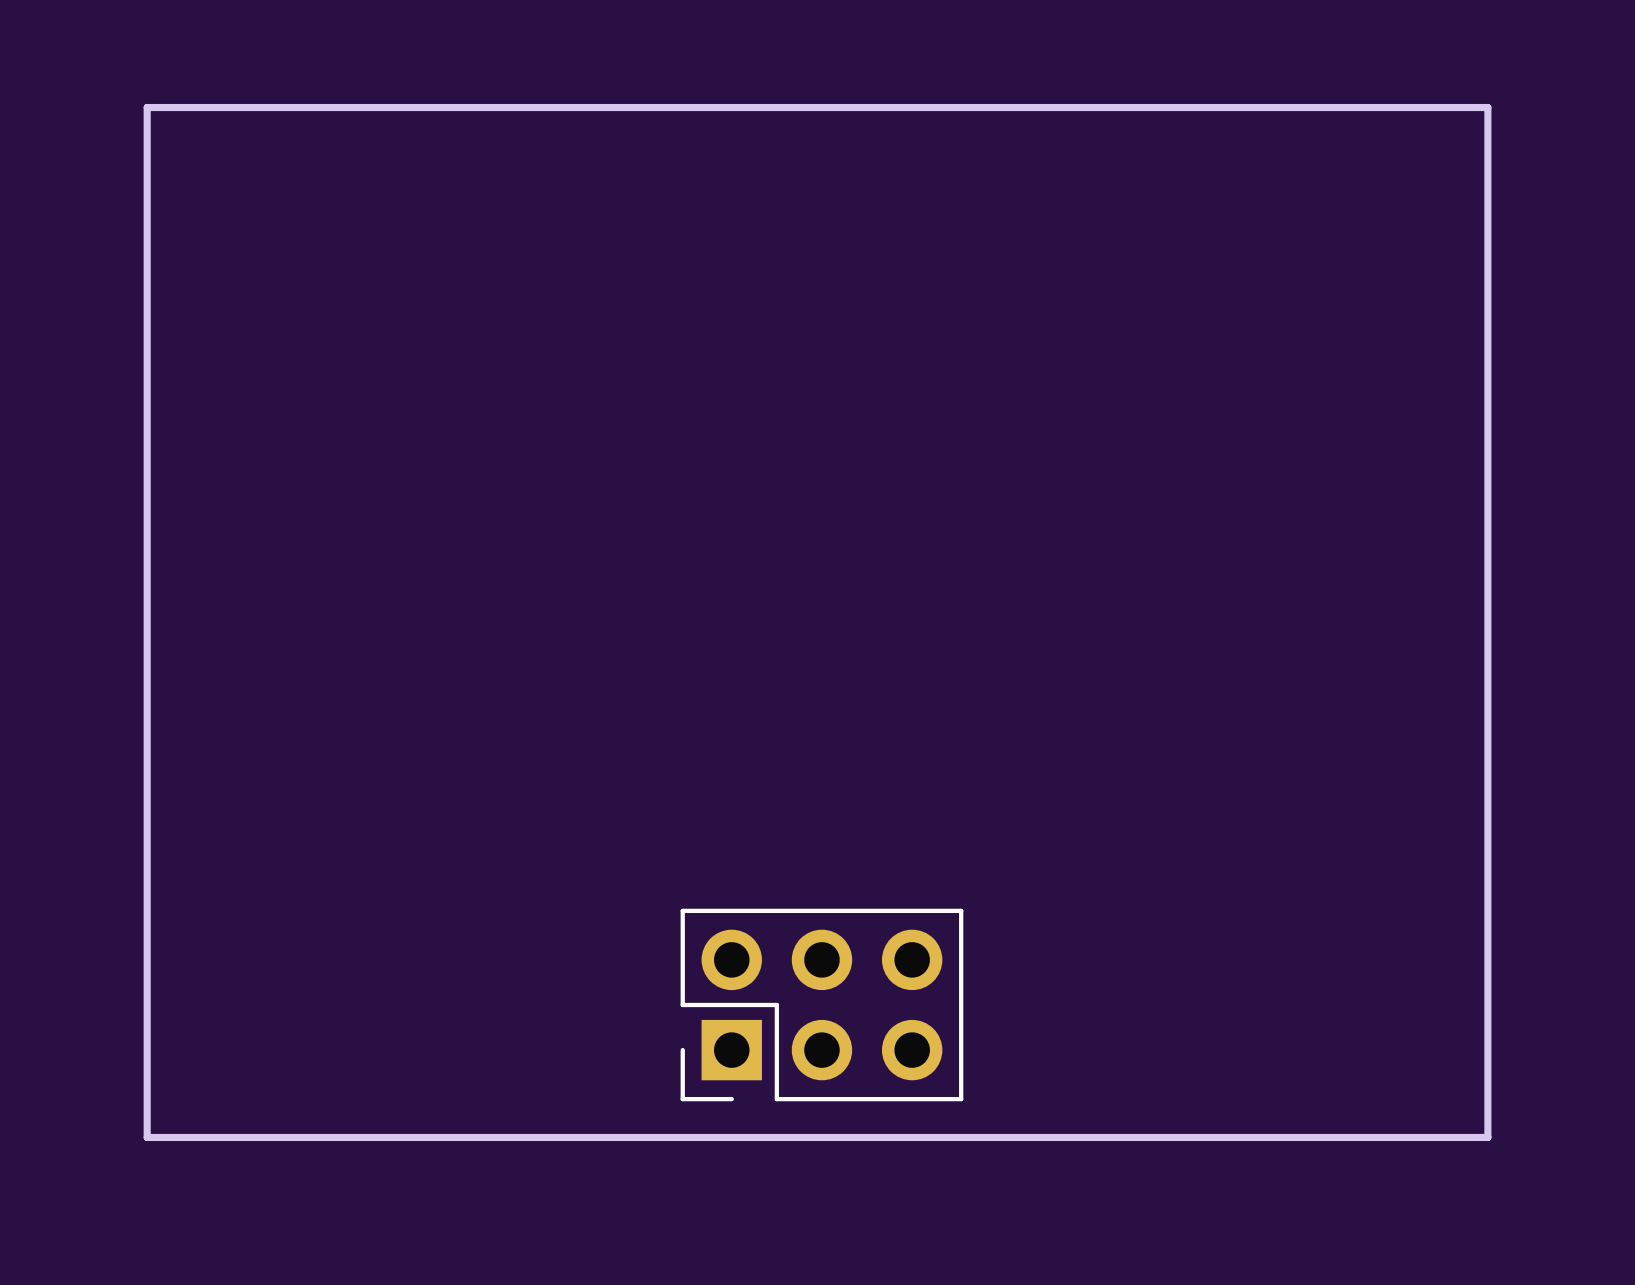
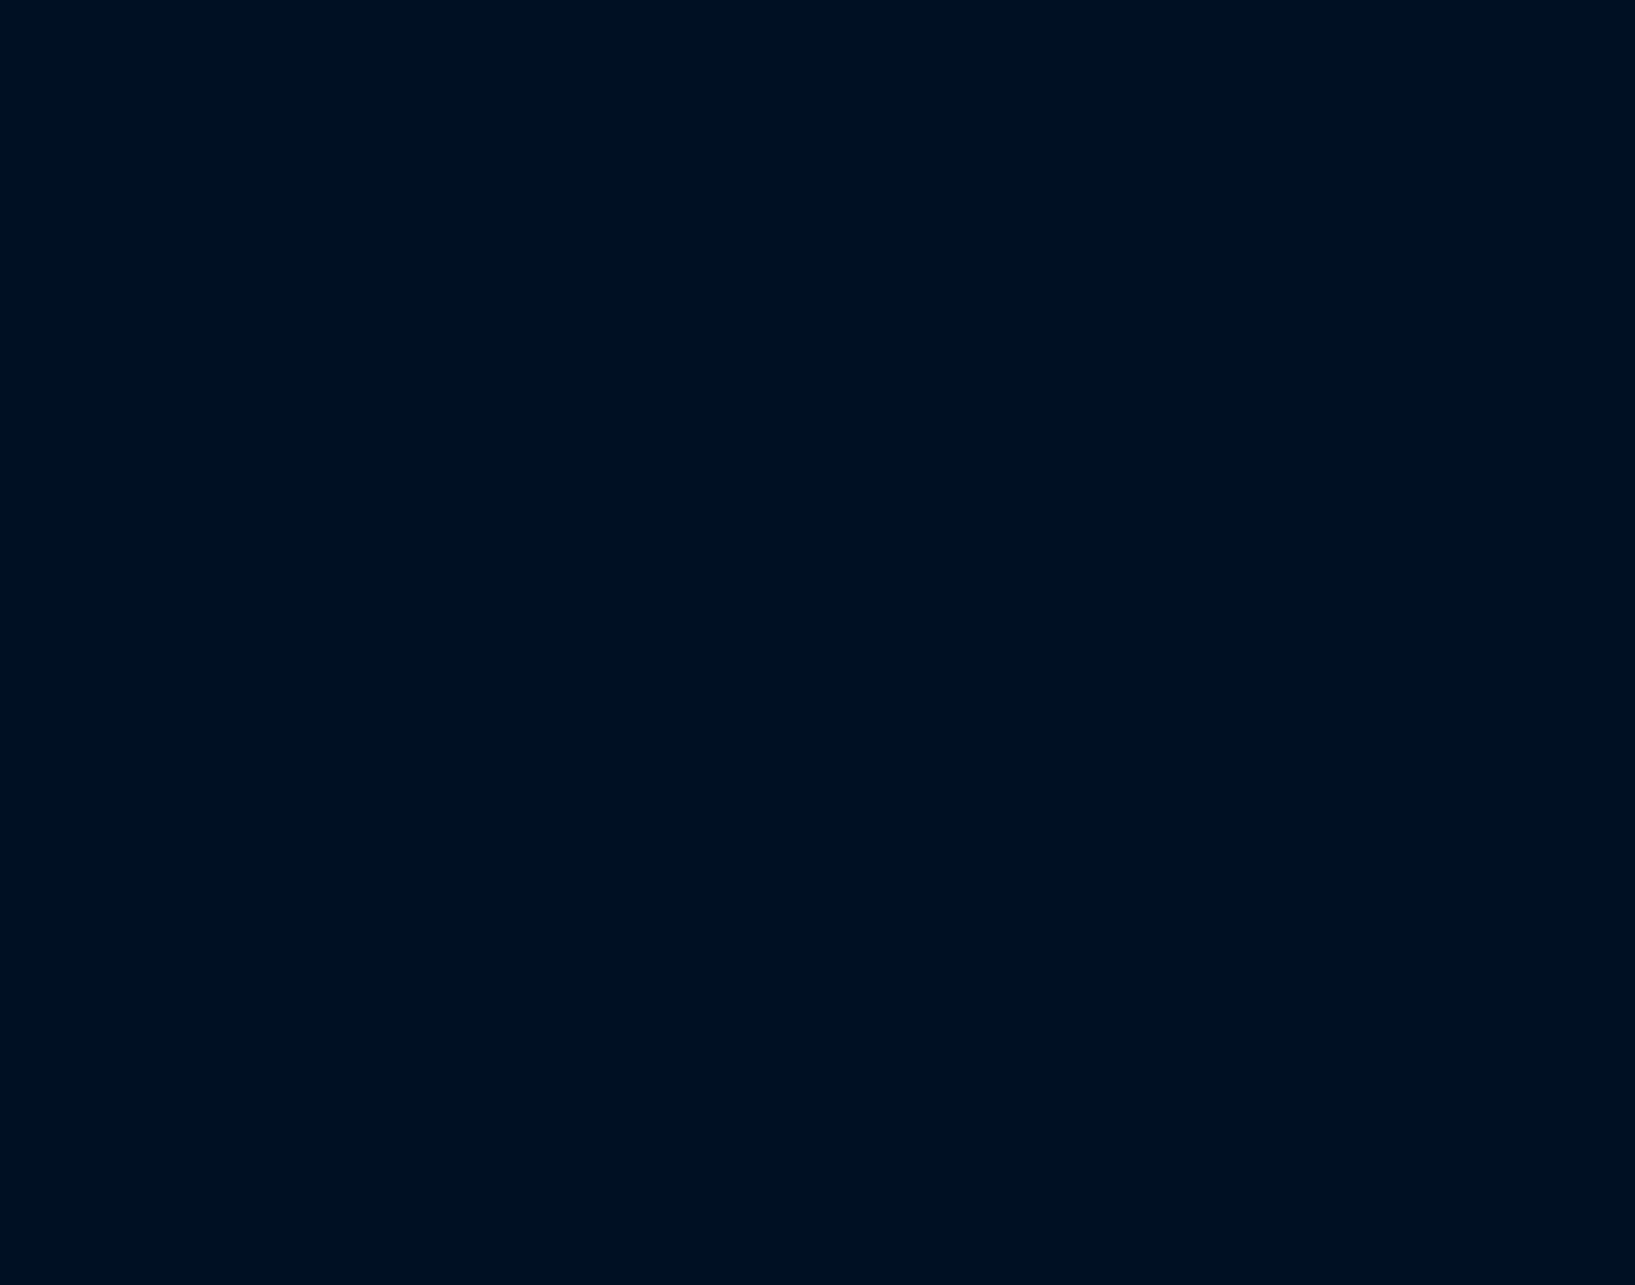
board edge: (147, 107) (1487, 107) (1487, 1137) (147, 1137) (147, 107) -> none
part: (821, 1004) -> none

